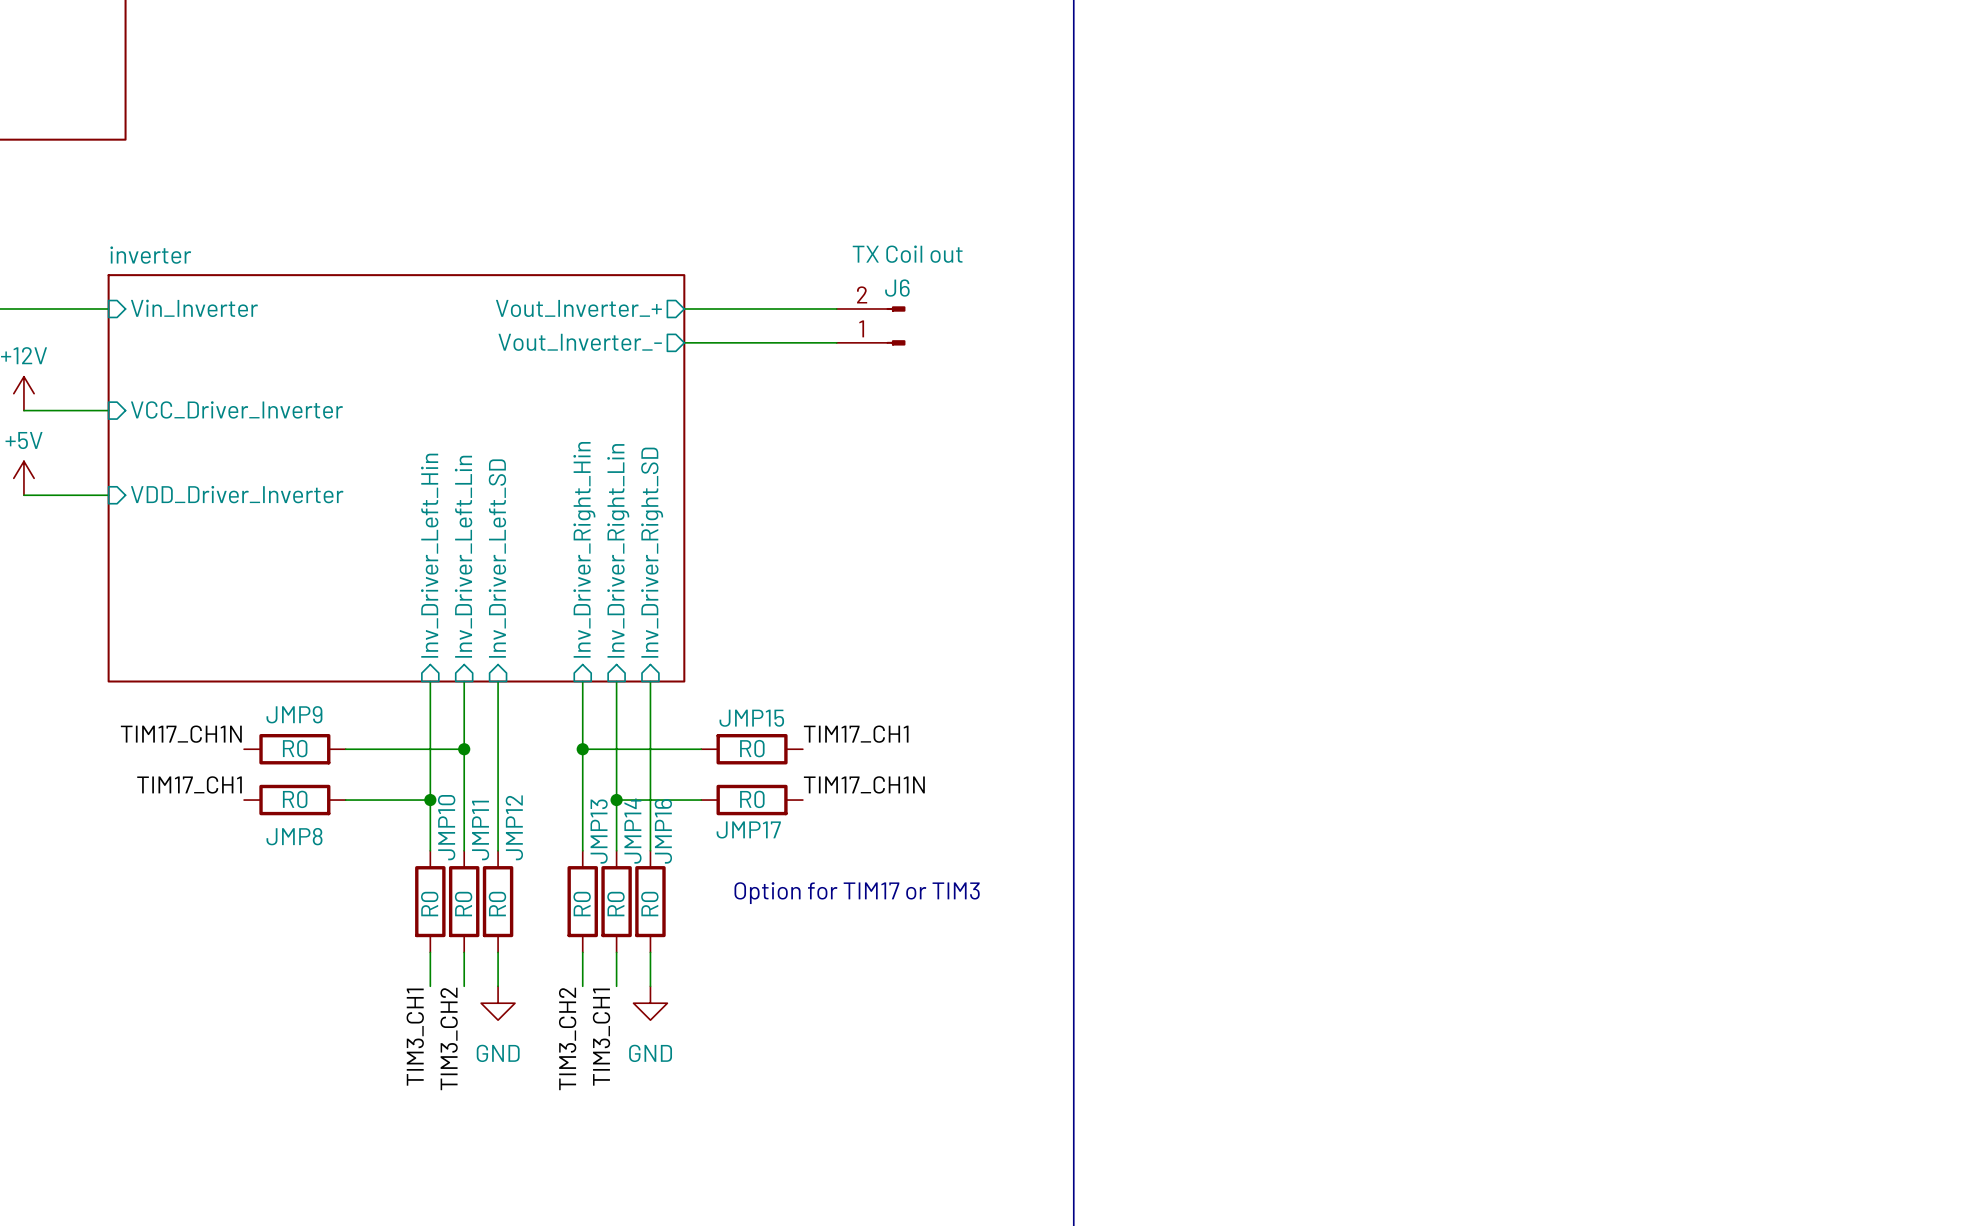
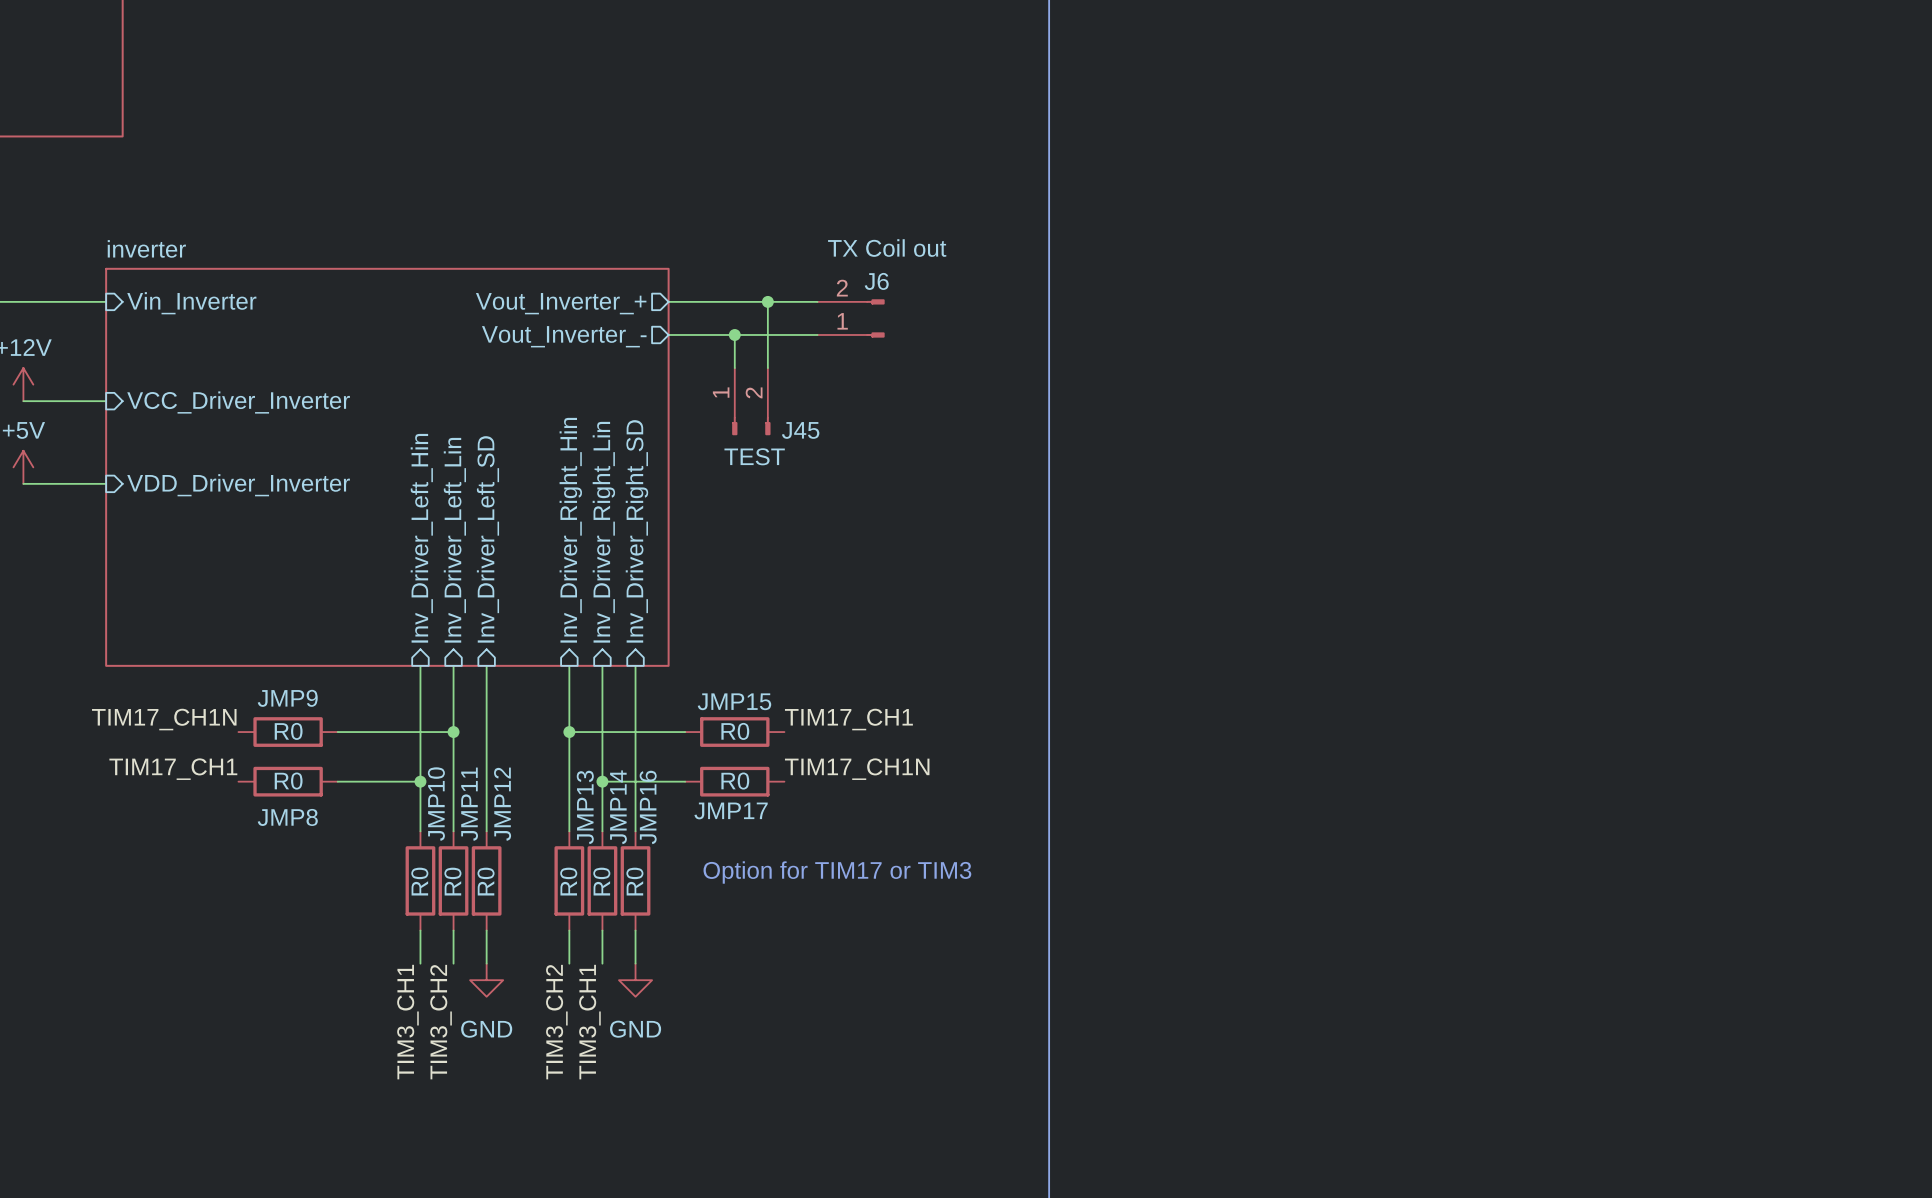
wire: none -> (767, 301) (767, 368)
junction: none -> (767, 301)
wire: none -> (734, 334) (734, 368)
junction: none -> (734, 334)
J45: none -> TEST (751, 401)

